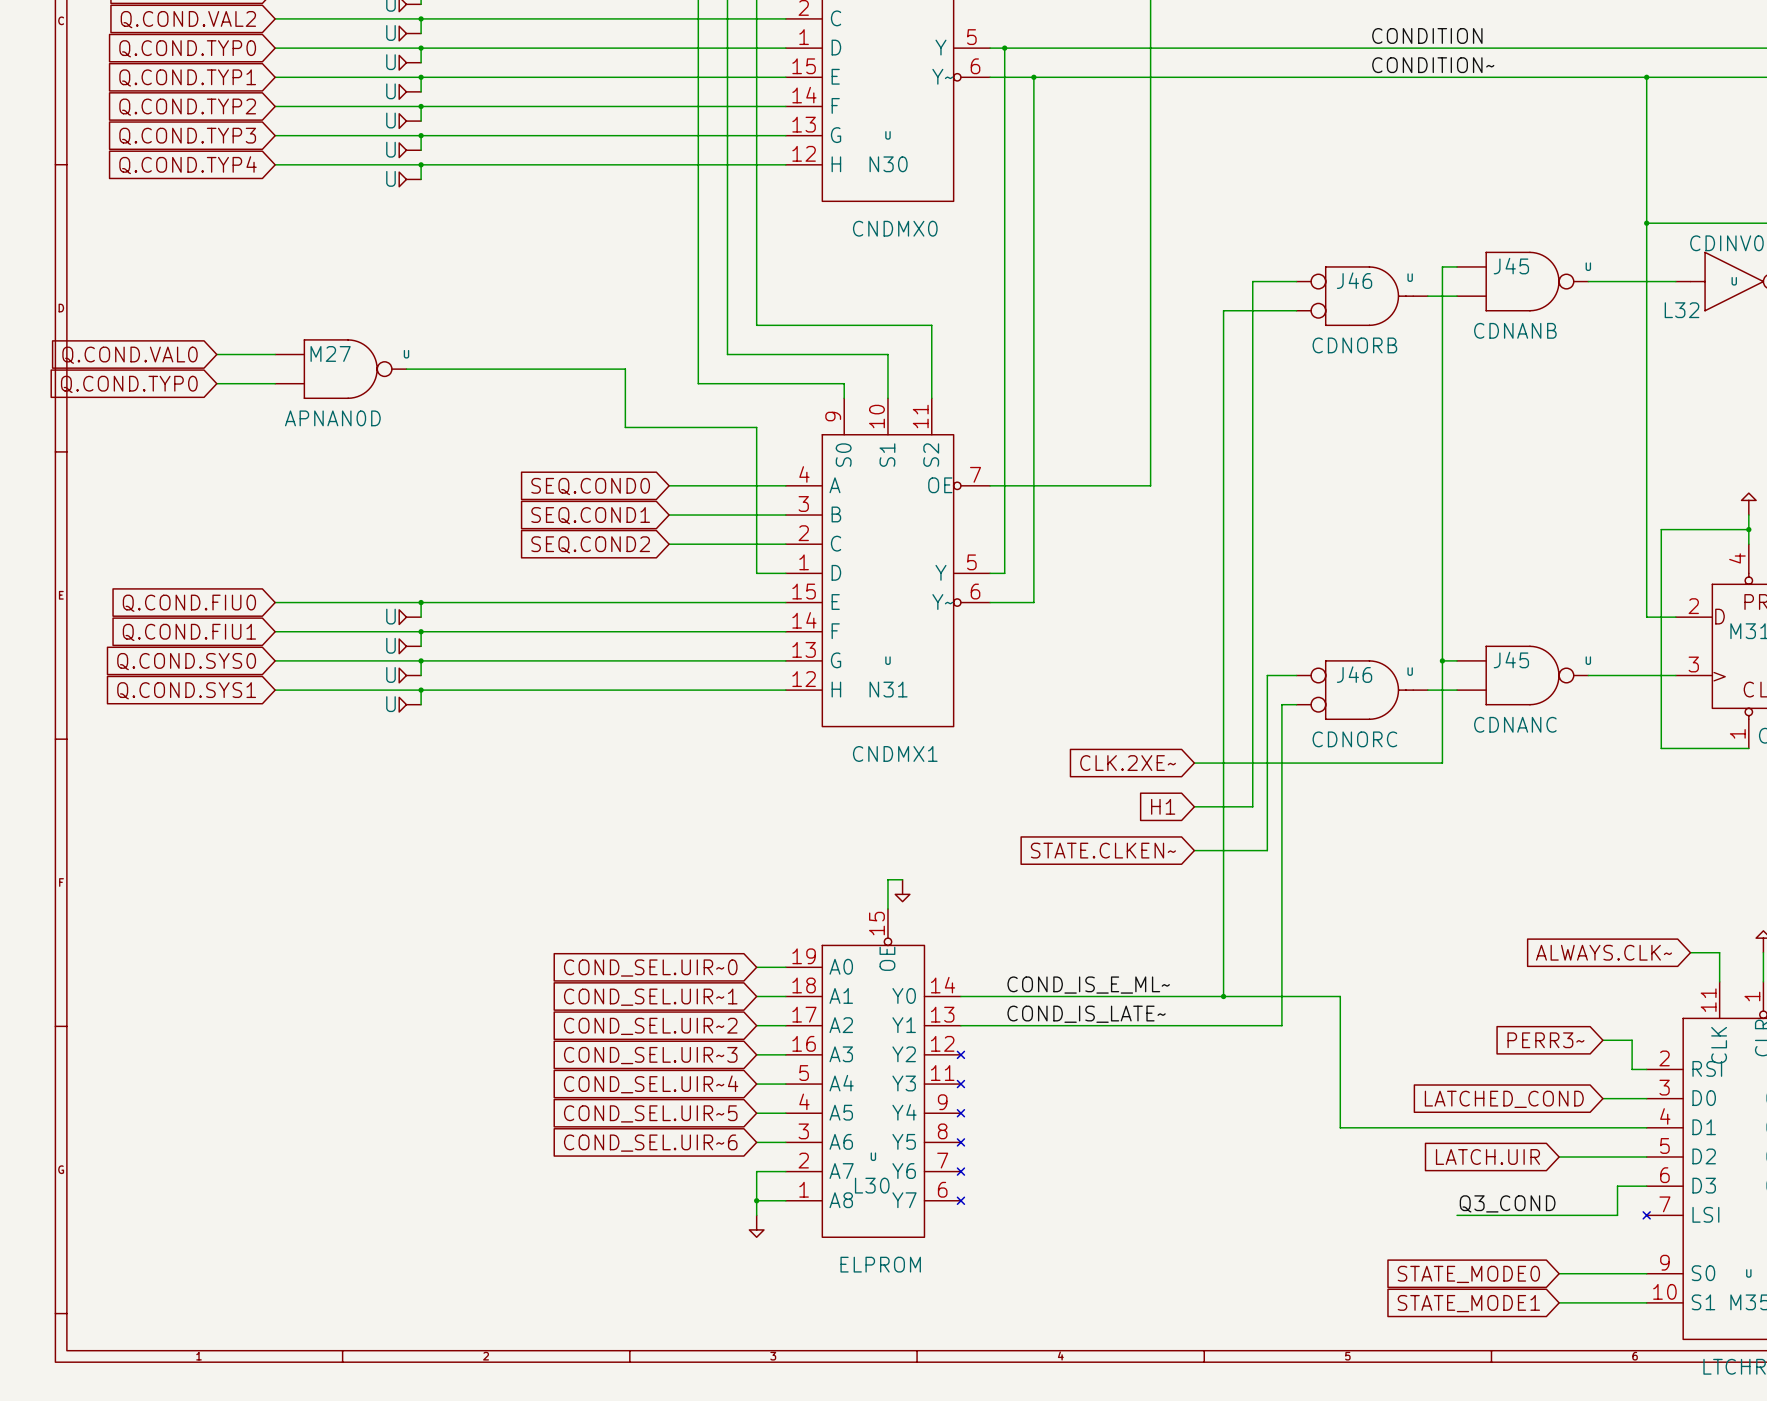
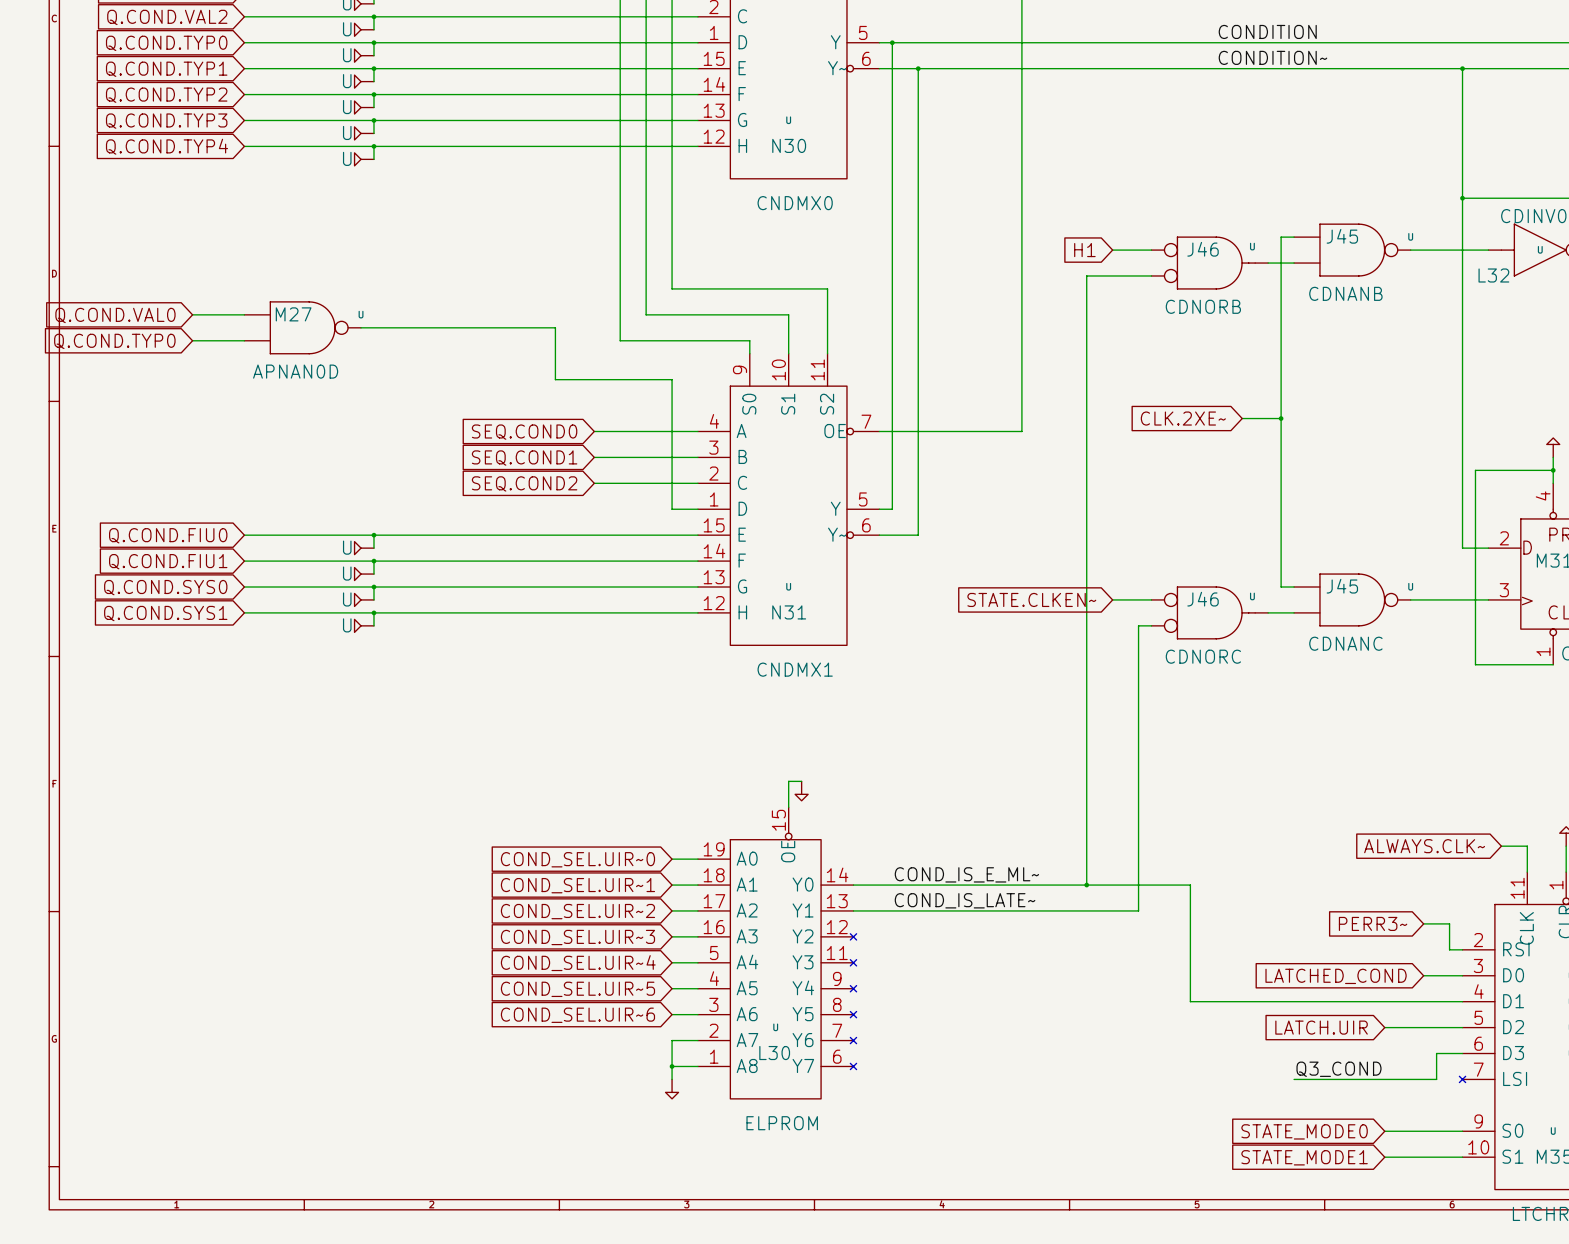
global label: none -> H1 (1084, 250)
wire: (1252, 281) (1252, 806) (1194, 806) -> none
global label: none -> CLK.2XE~ (1183, 418)
wire: none -> (1242, 418) (1281, 418)
junction: none -> (1281, 418)
wire: (1442, 660) (1442, 763) (1194, 763) -> none
junction: (1442, 660) -> none
global label: none -> STATE.CLKEN~ (1031, 599)
wire: (1267, 675) (1267, 850) (1194, 850) -> (1125, 599) (1112, 599)
global label: CLK.2XE~ (1128, 763) -> none
global label: H1 (1163, 806) -> none
global label: STATE.CLKEN~ (1103, 850) -> none

